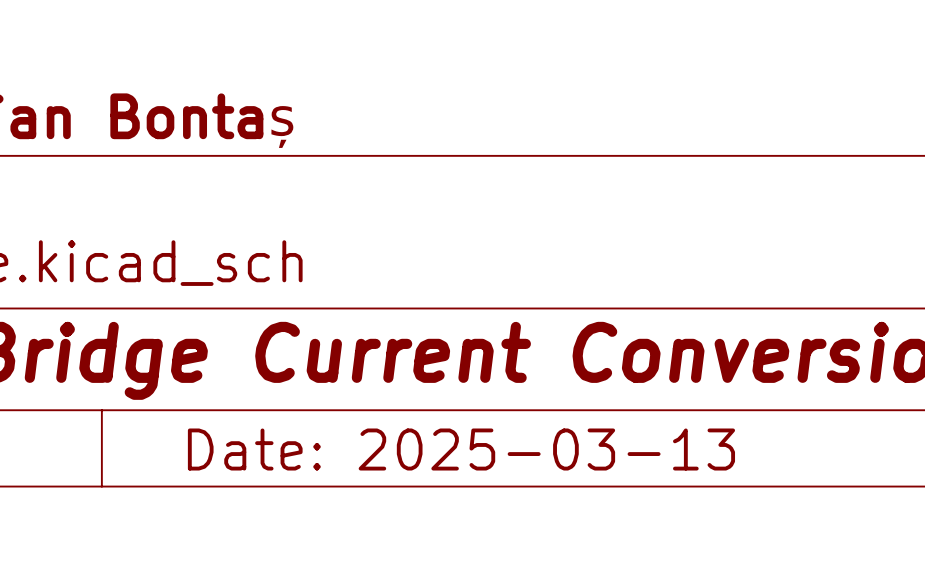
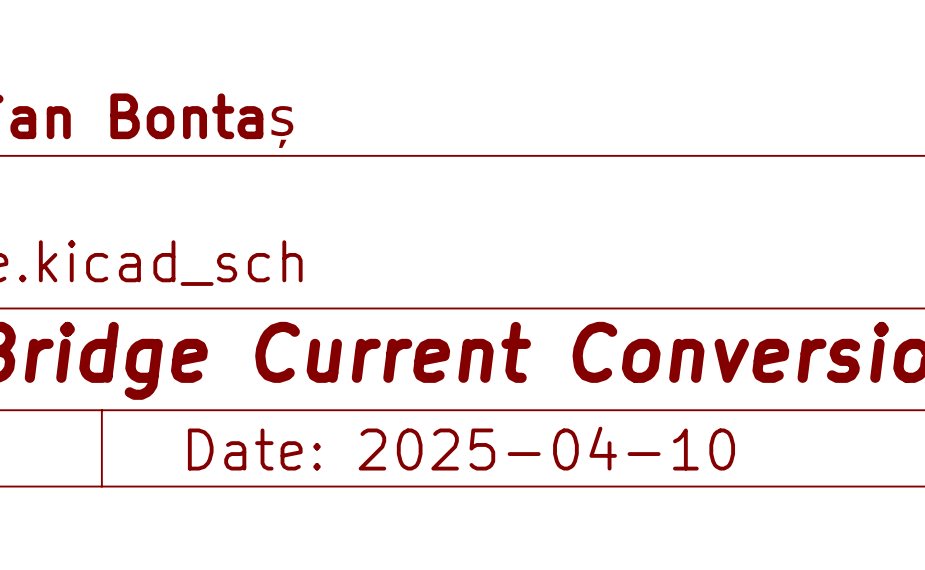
title block: Date: 2025-03-13 (461, 449) -> Date: 2025-04-10 (461, 448)

